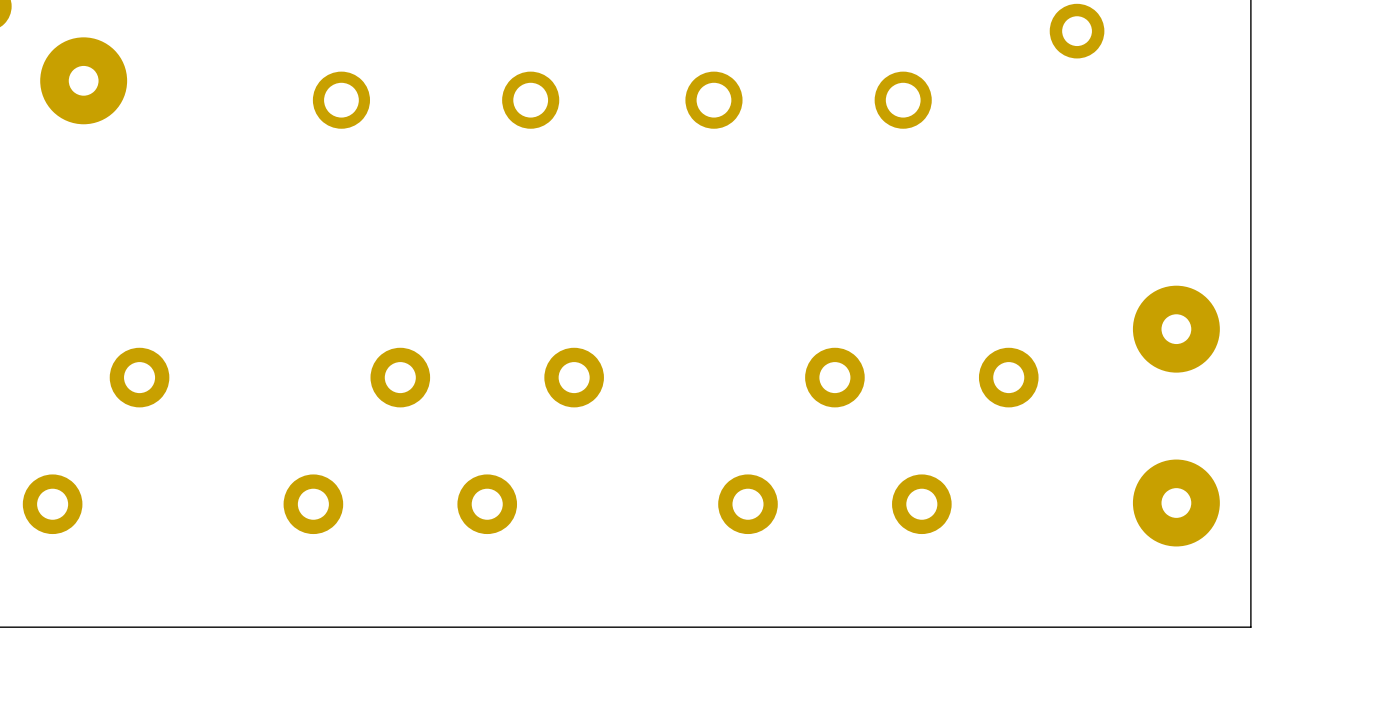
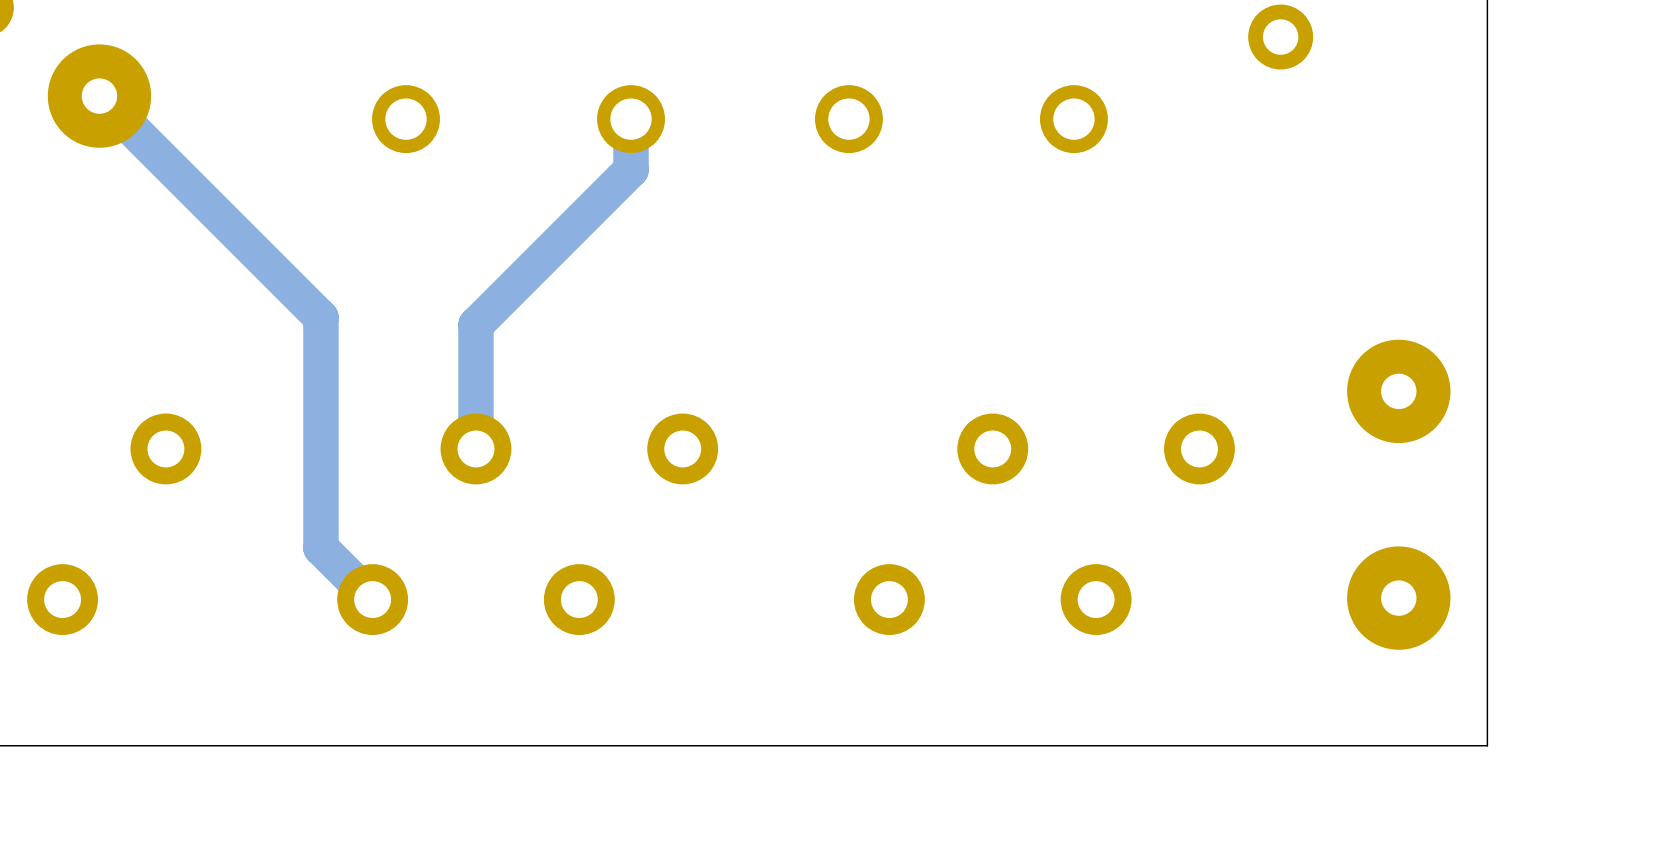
track: none -> (99, 96) (320, 317) (320, 547) (372, 599)
track: none -> (631, 119) (631, 169) (475, 324) (475, 448)

